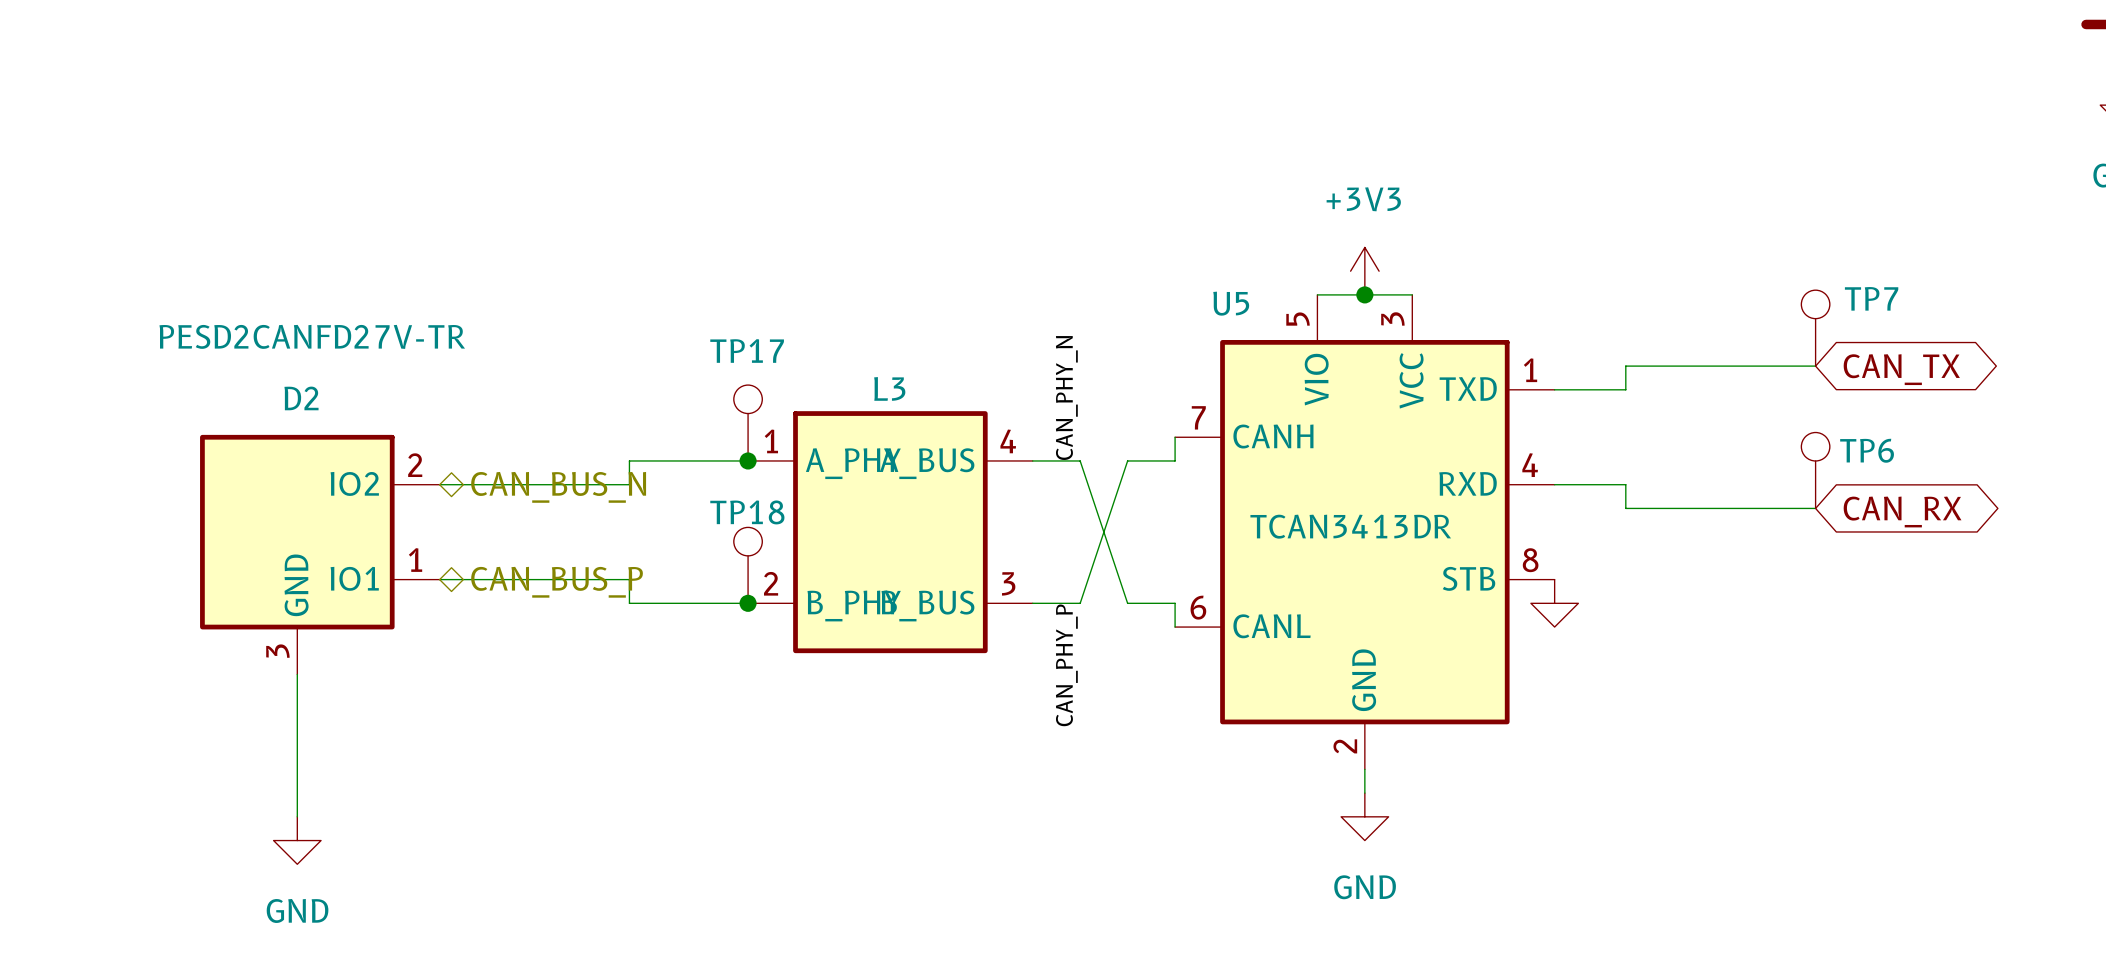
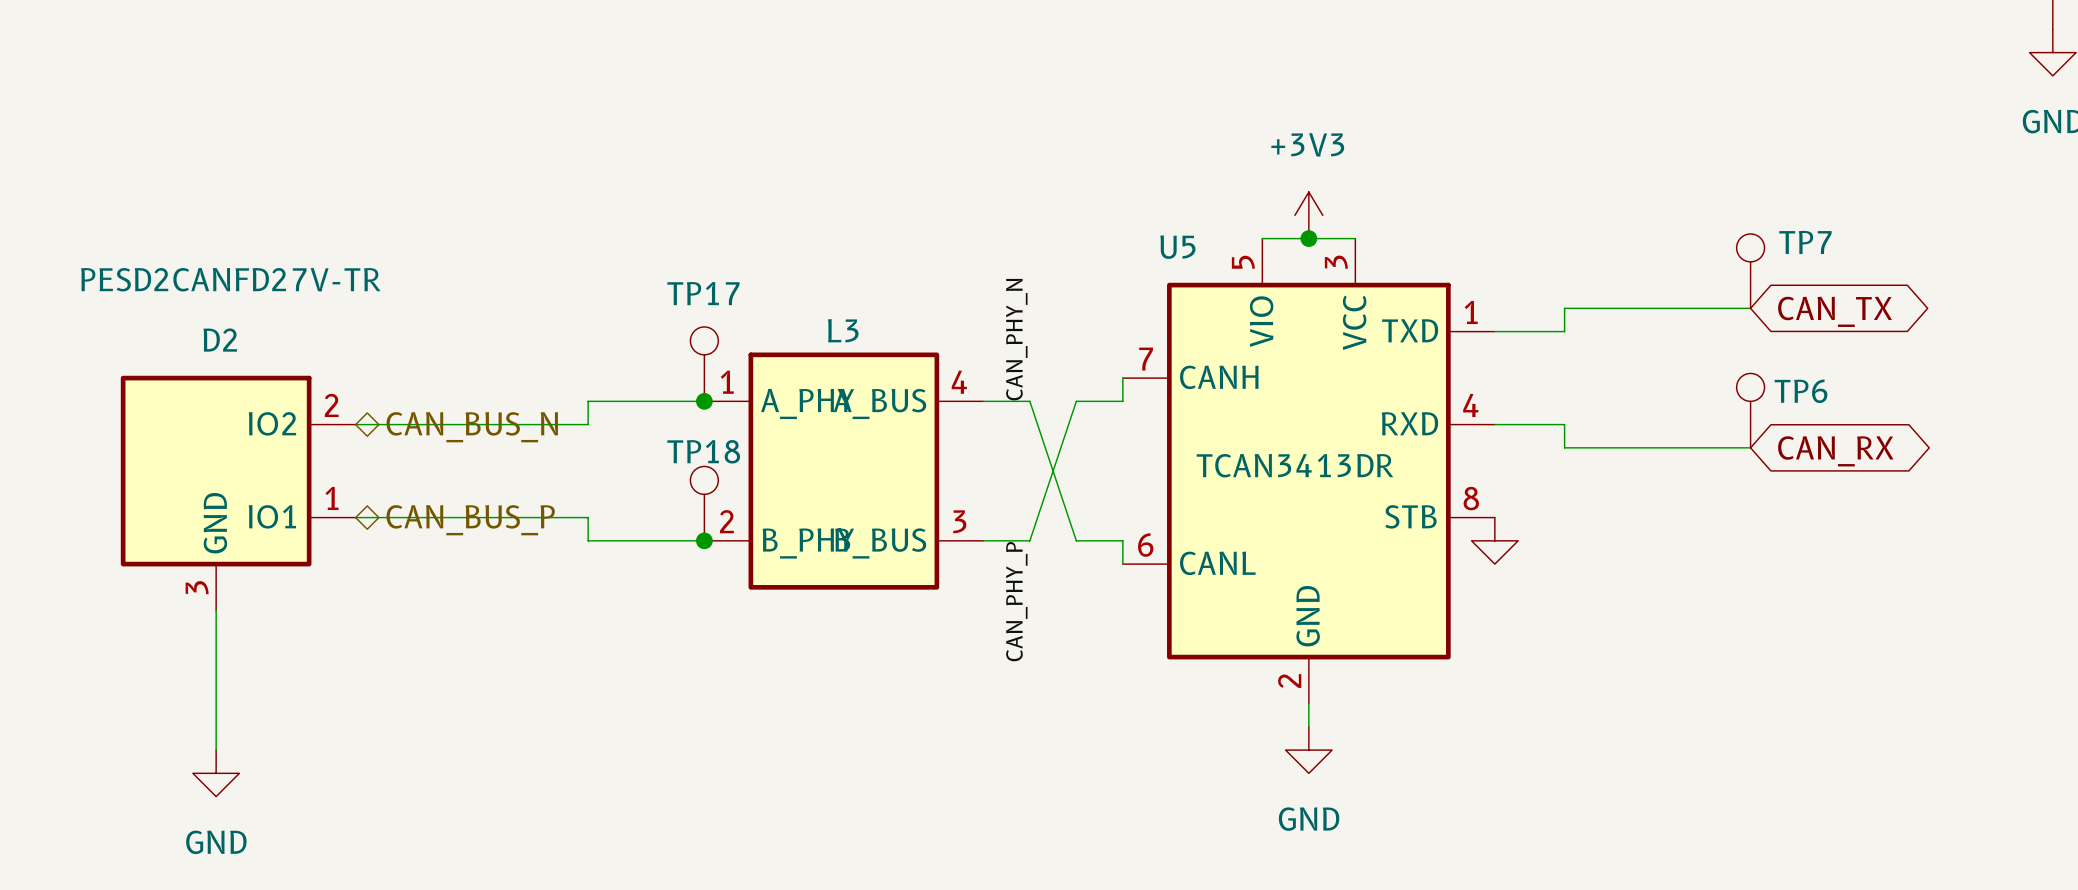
hierarchical label position: CAN_BUS_N (558, 487) -> CAN_BUS_N (472, 427)
D2 position: (319, 554) -> (238, 493)
hierarchical label position: CAN_BUS_P (557, 582) -> CAN_BUS_P (470, 520)
wire: (297, 674) (297, 816) -> (216, 610) (216, 750)
power symbol position: GND (297, 840) -> GND (216, 773)

